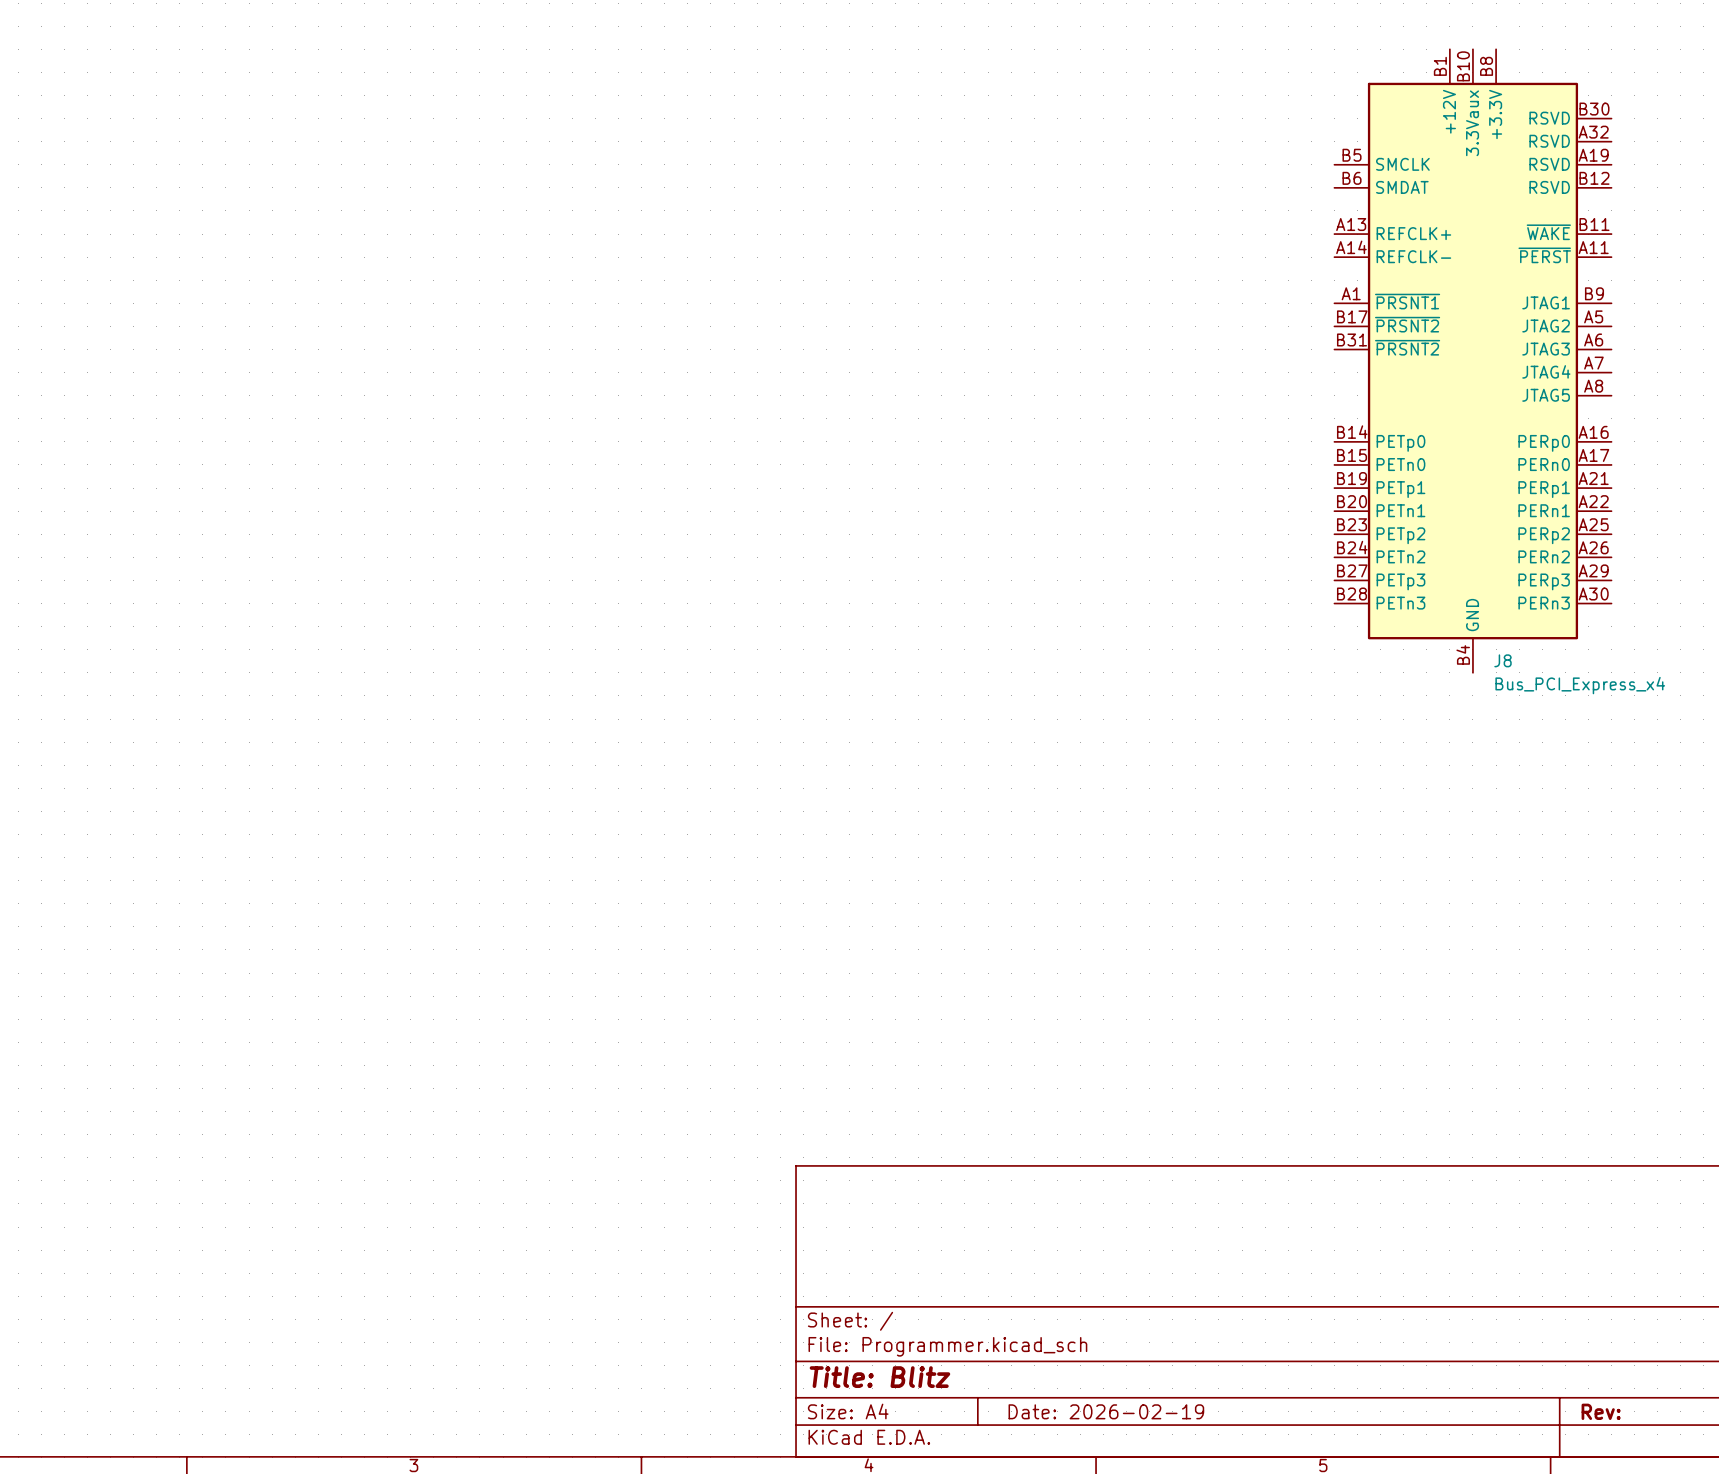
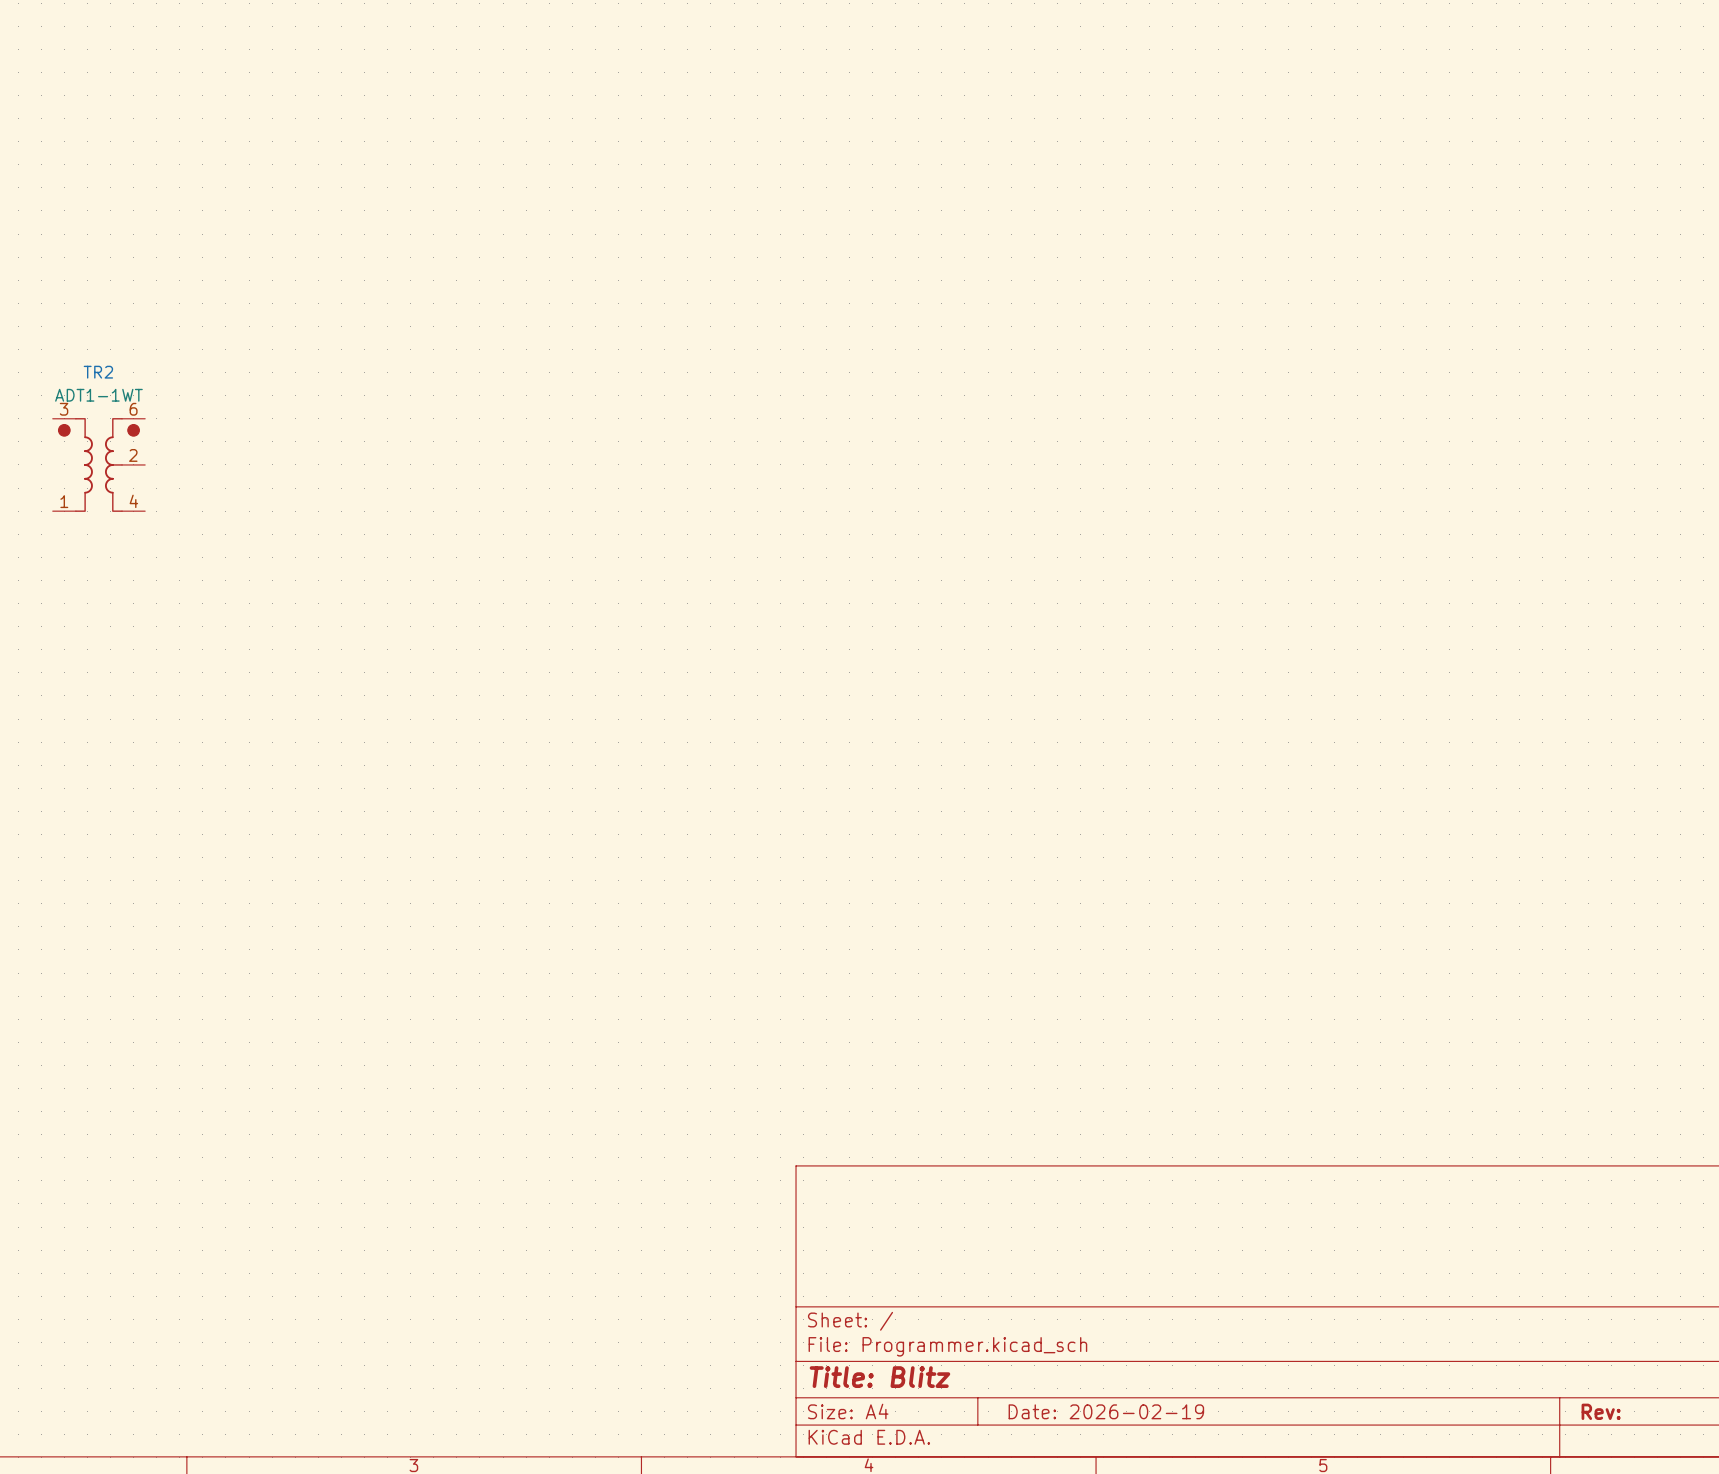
J8: Bus_PCI_Express_x4 (1472, 361) -> none
TR2: none -> ADT1-1WT (98, 464)

